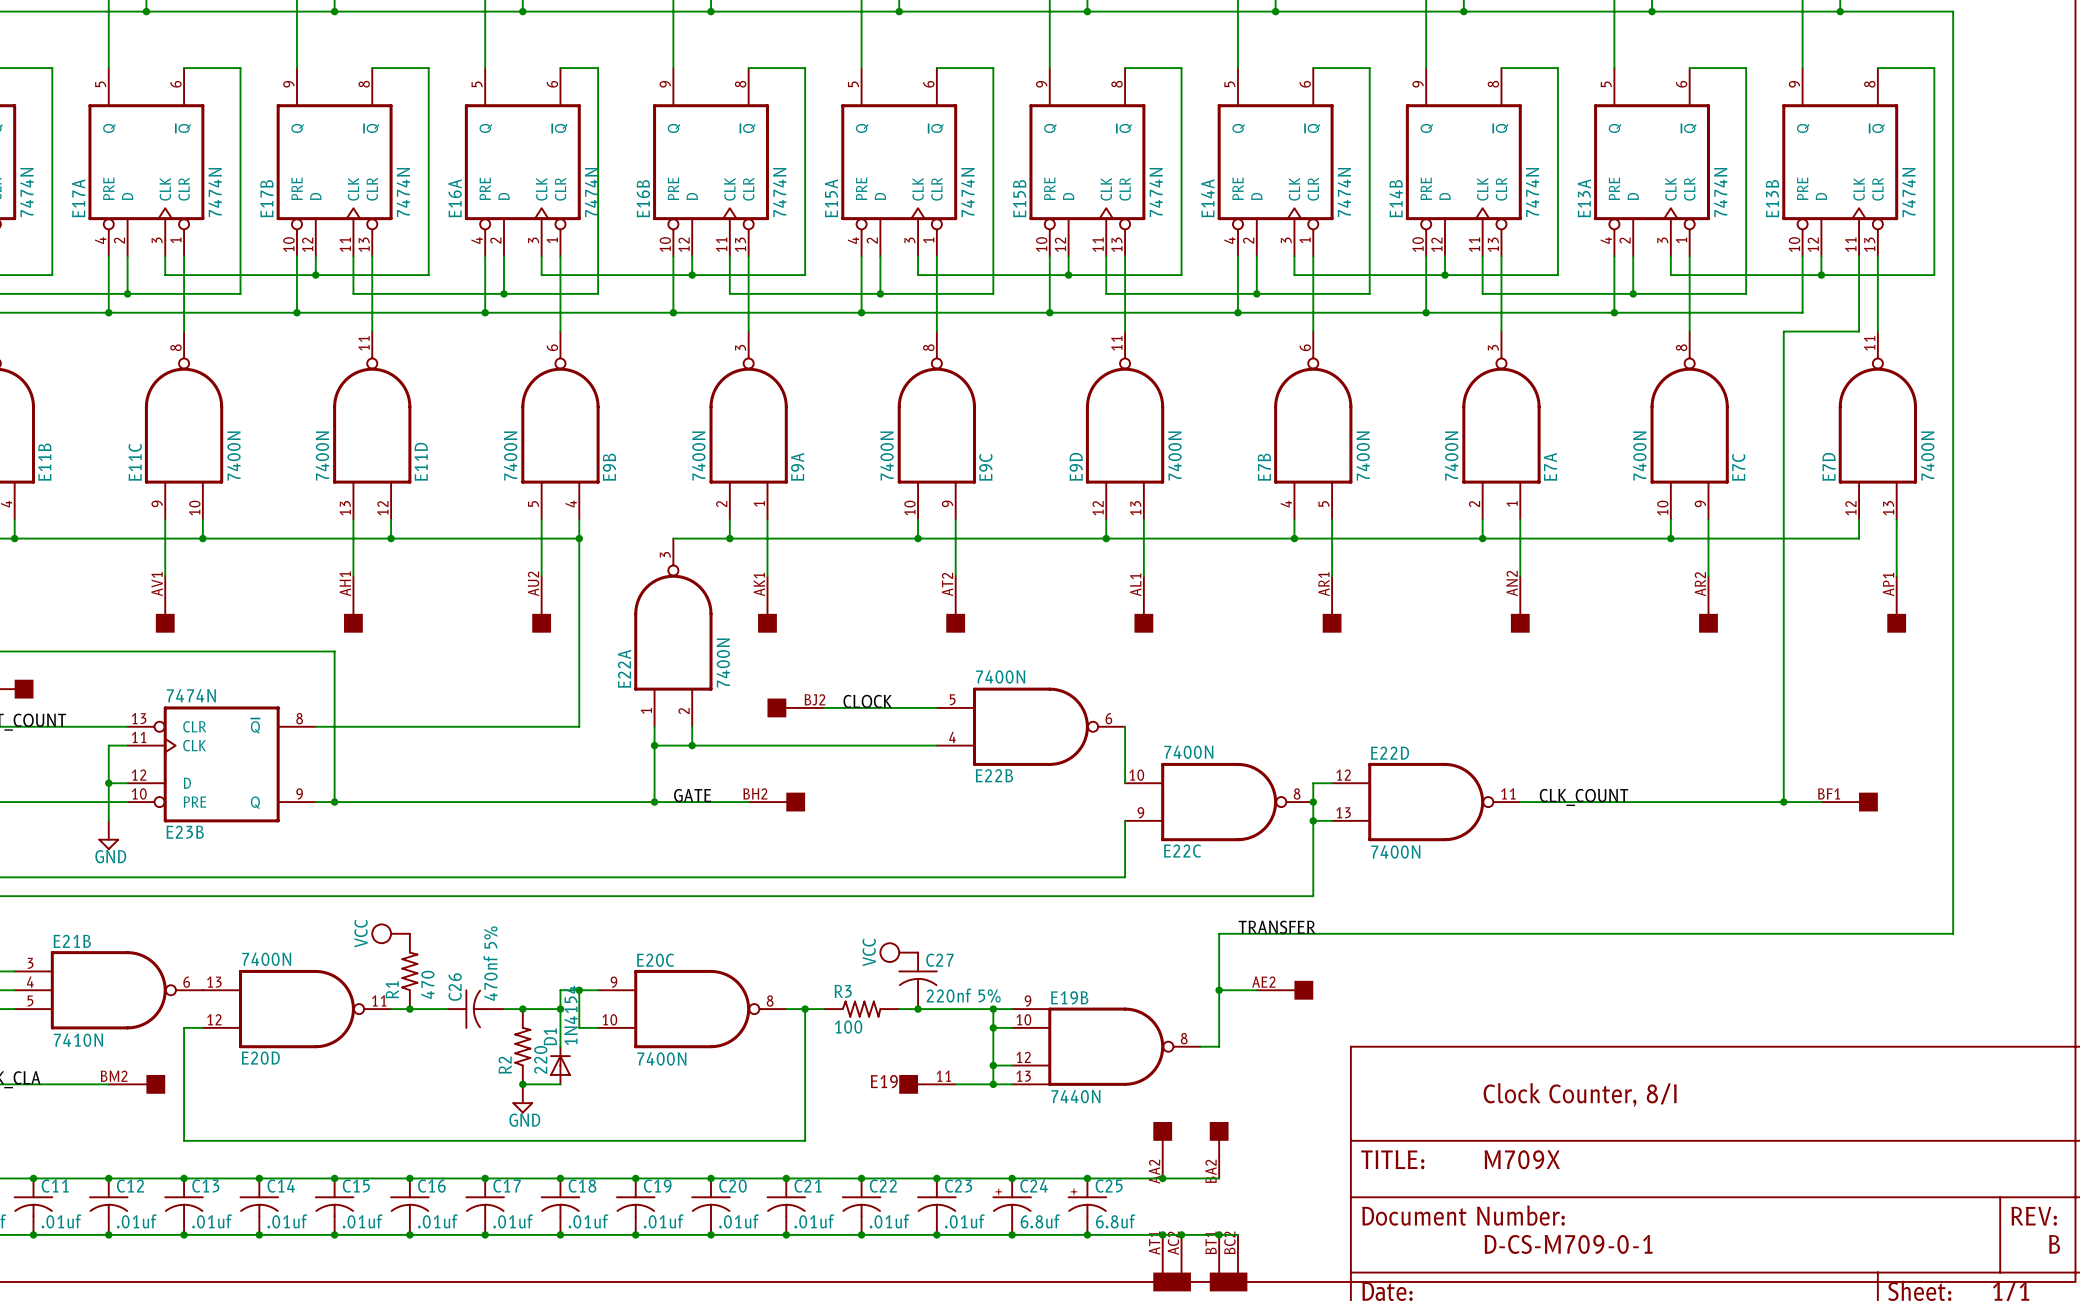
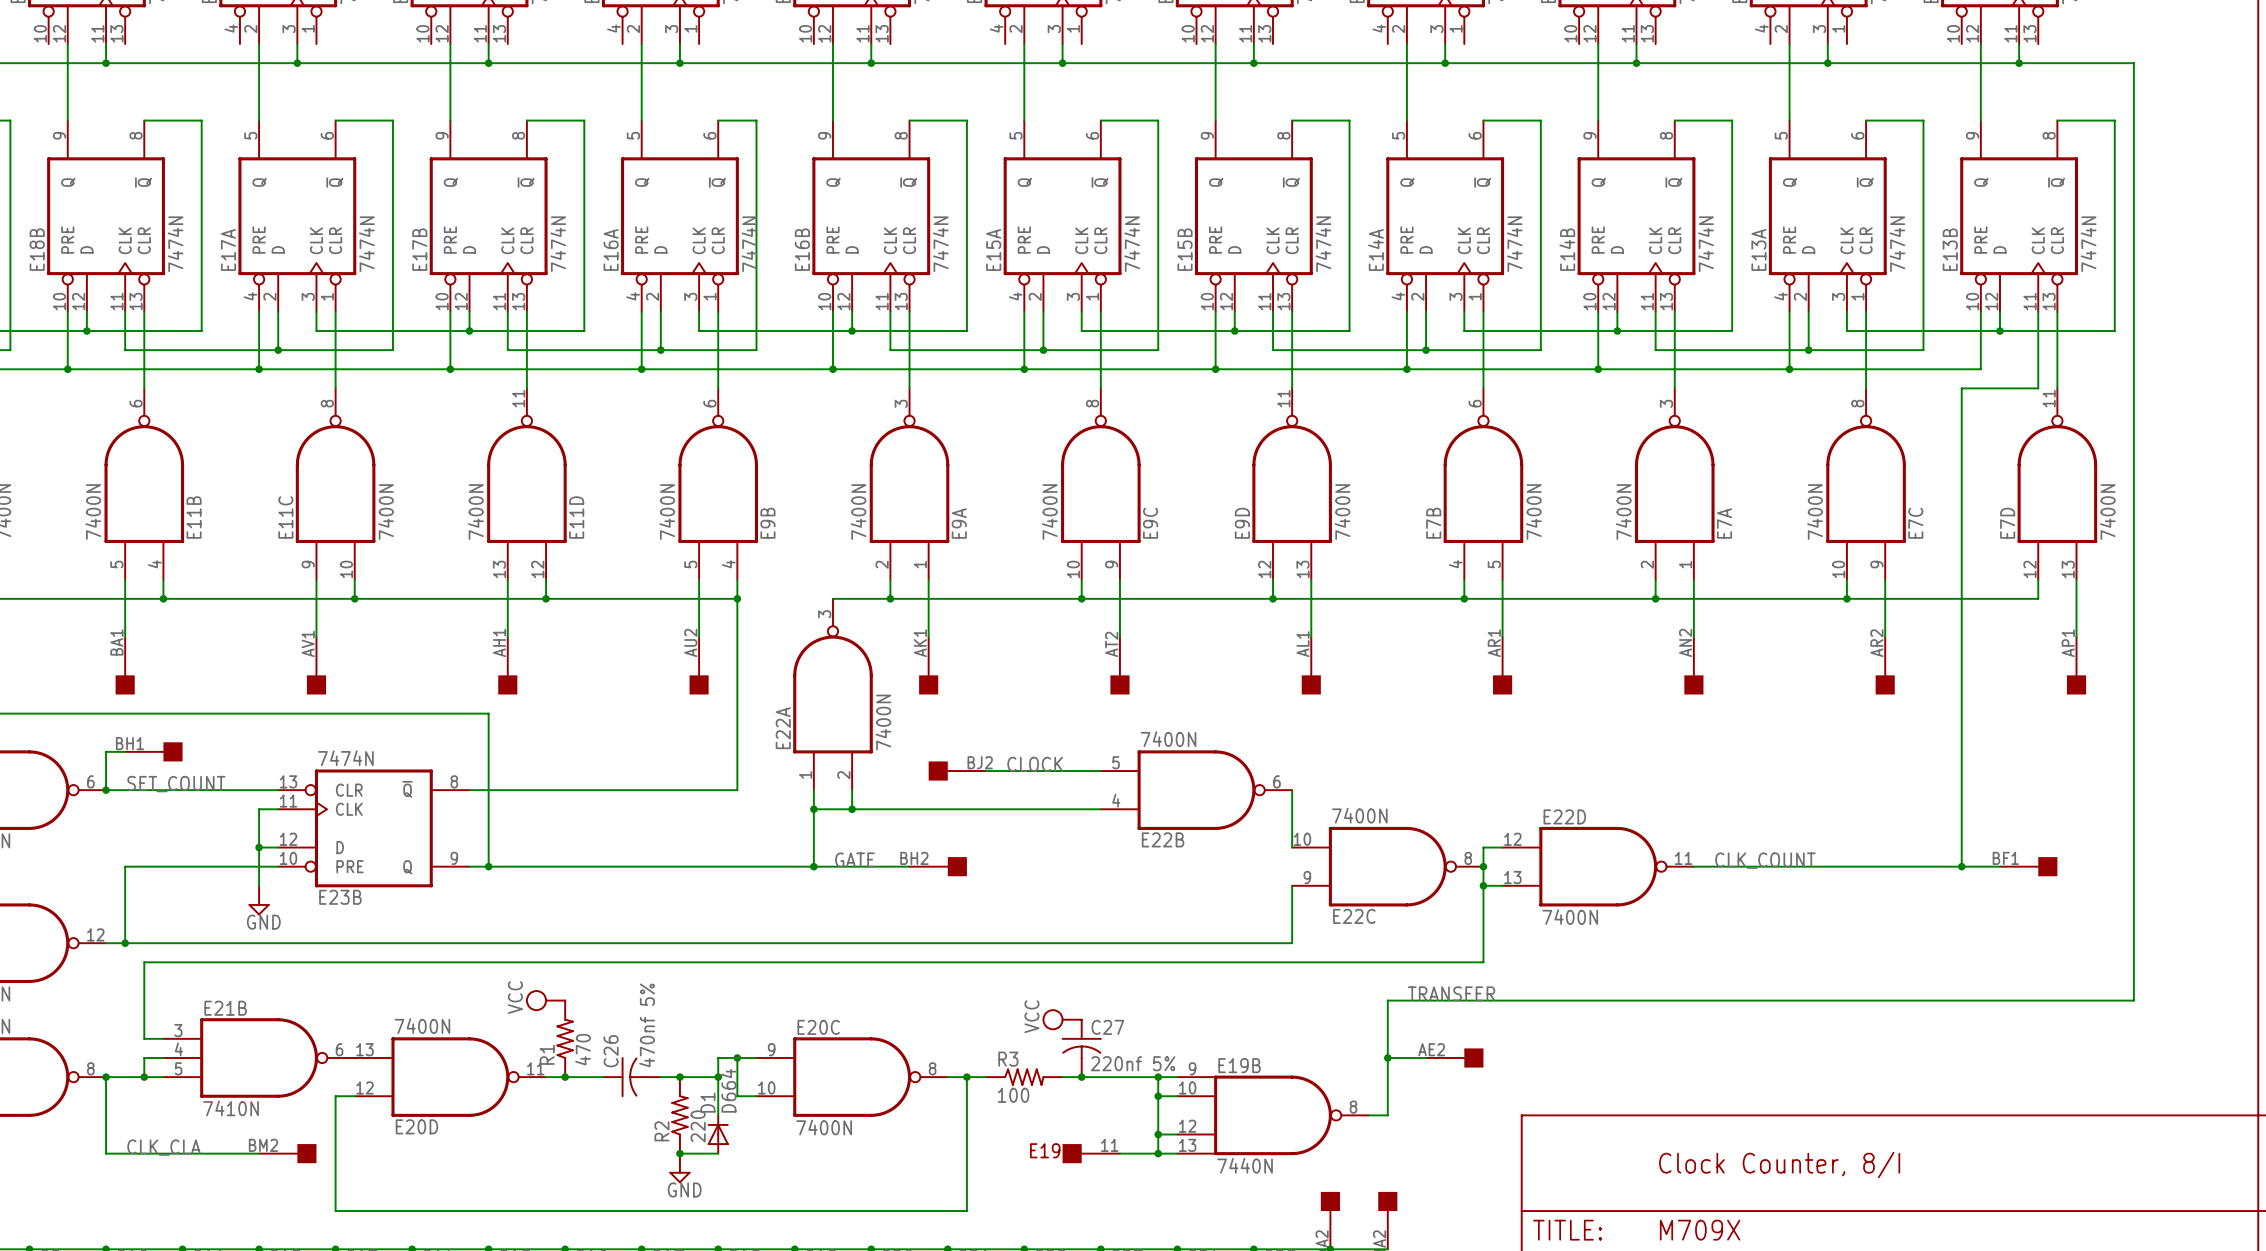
D1 value: 1N4154 (571, 1015) -> D664 (728, 1090)

